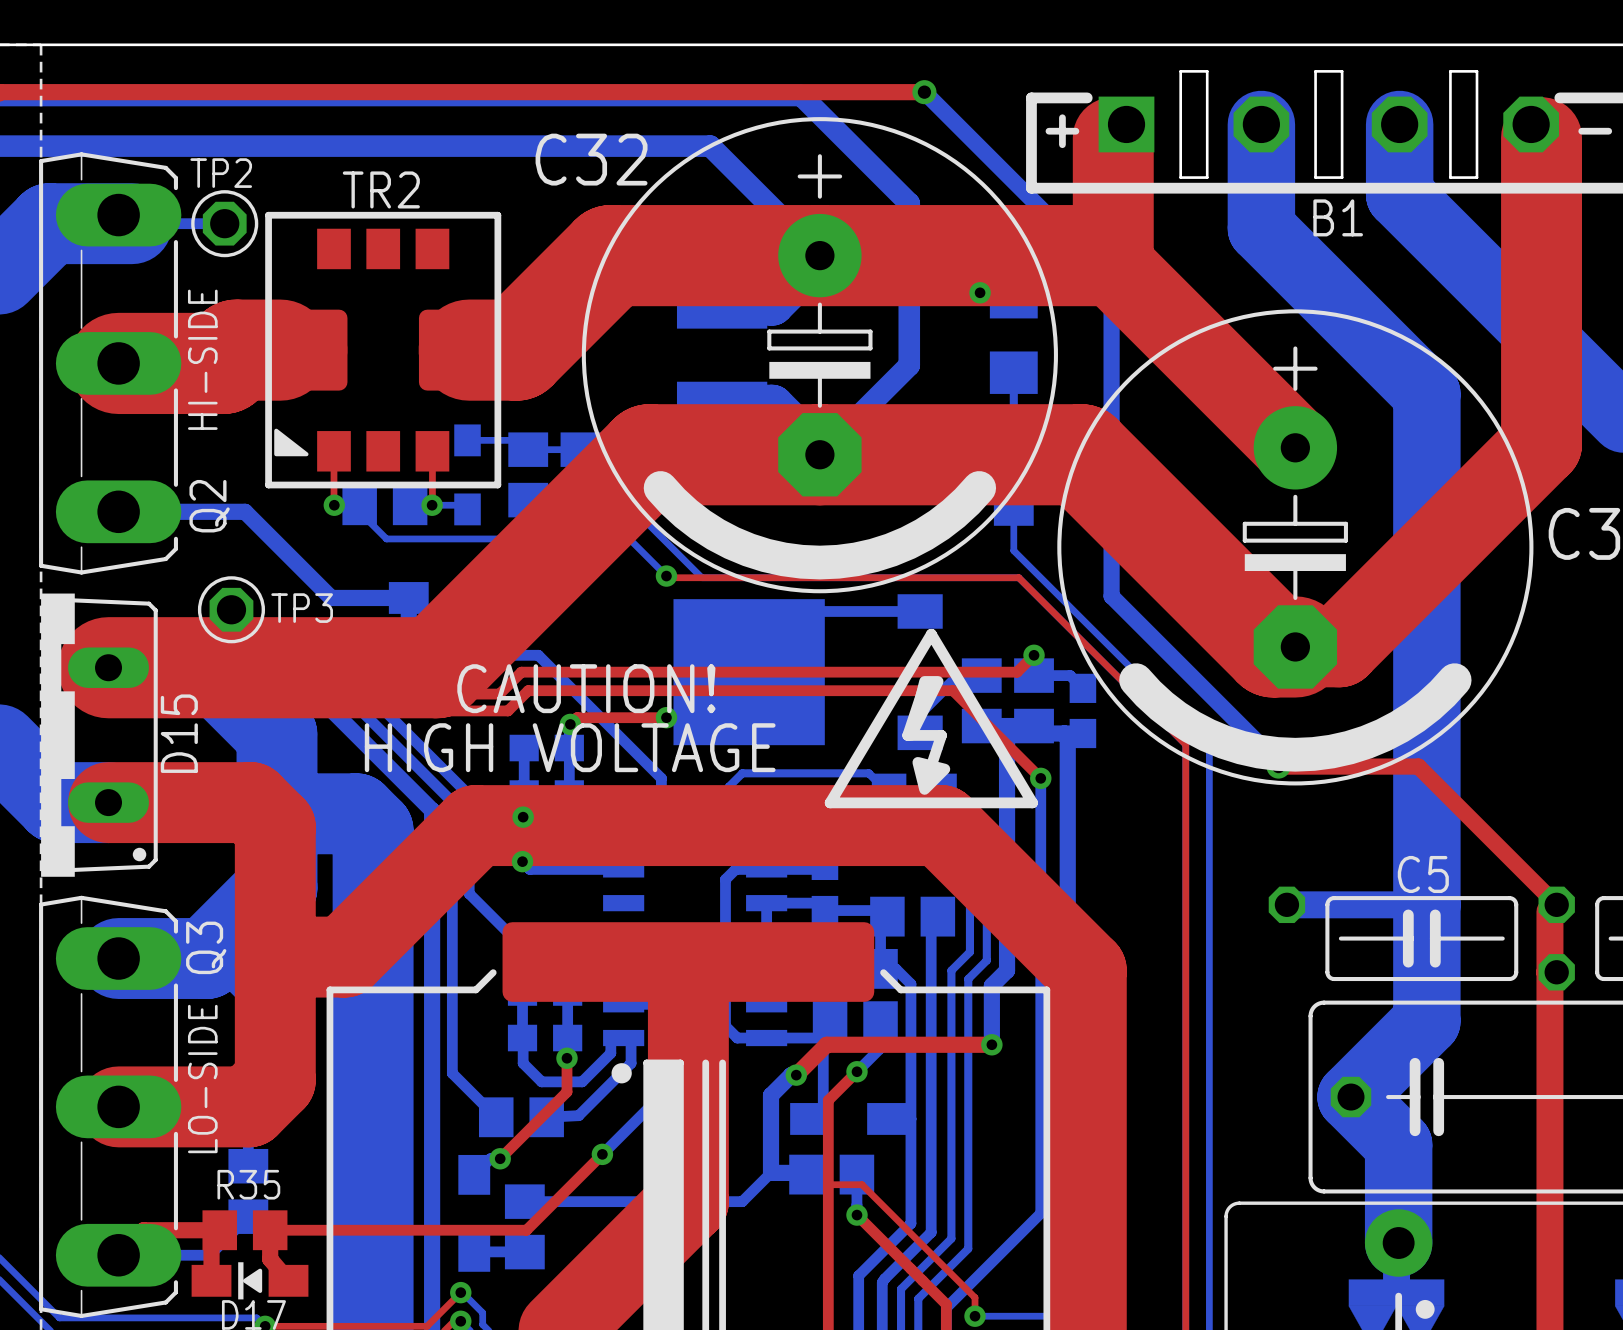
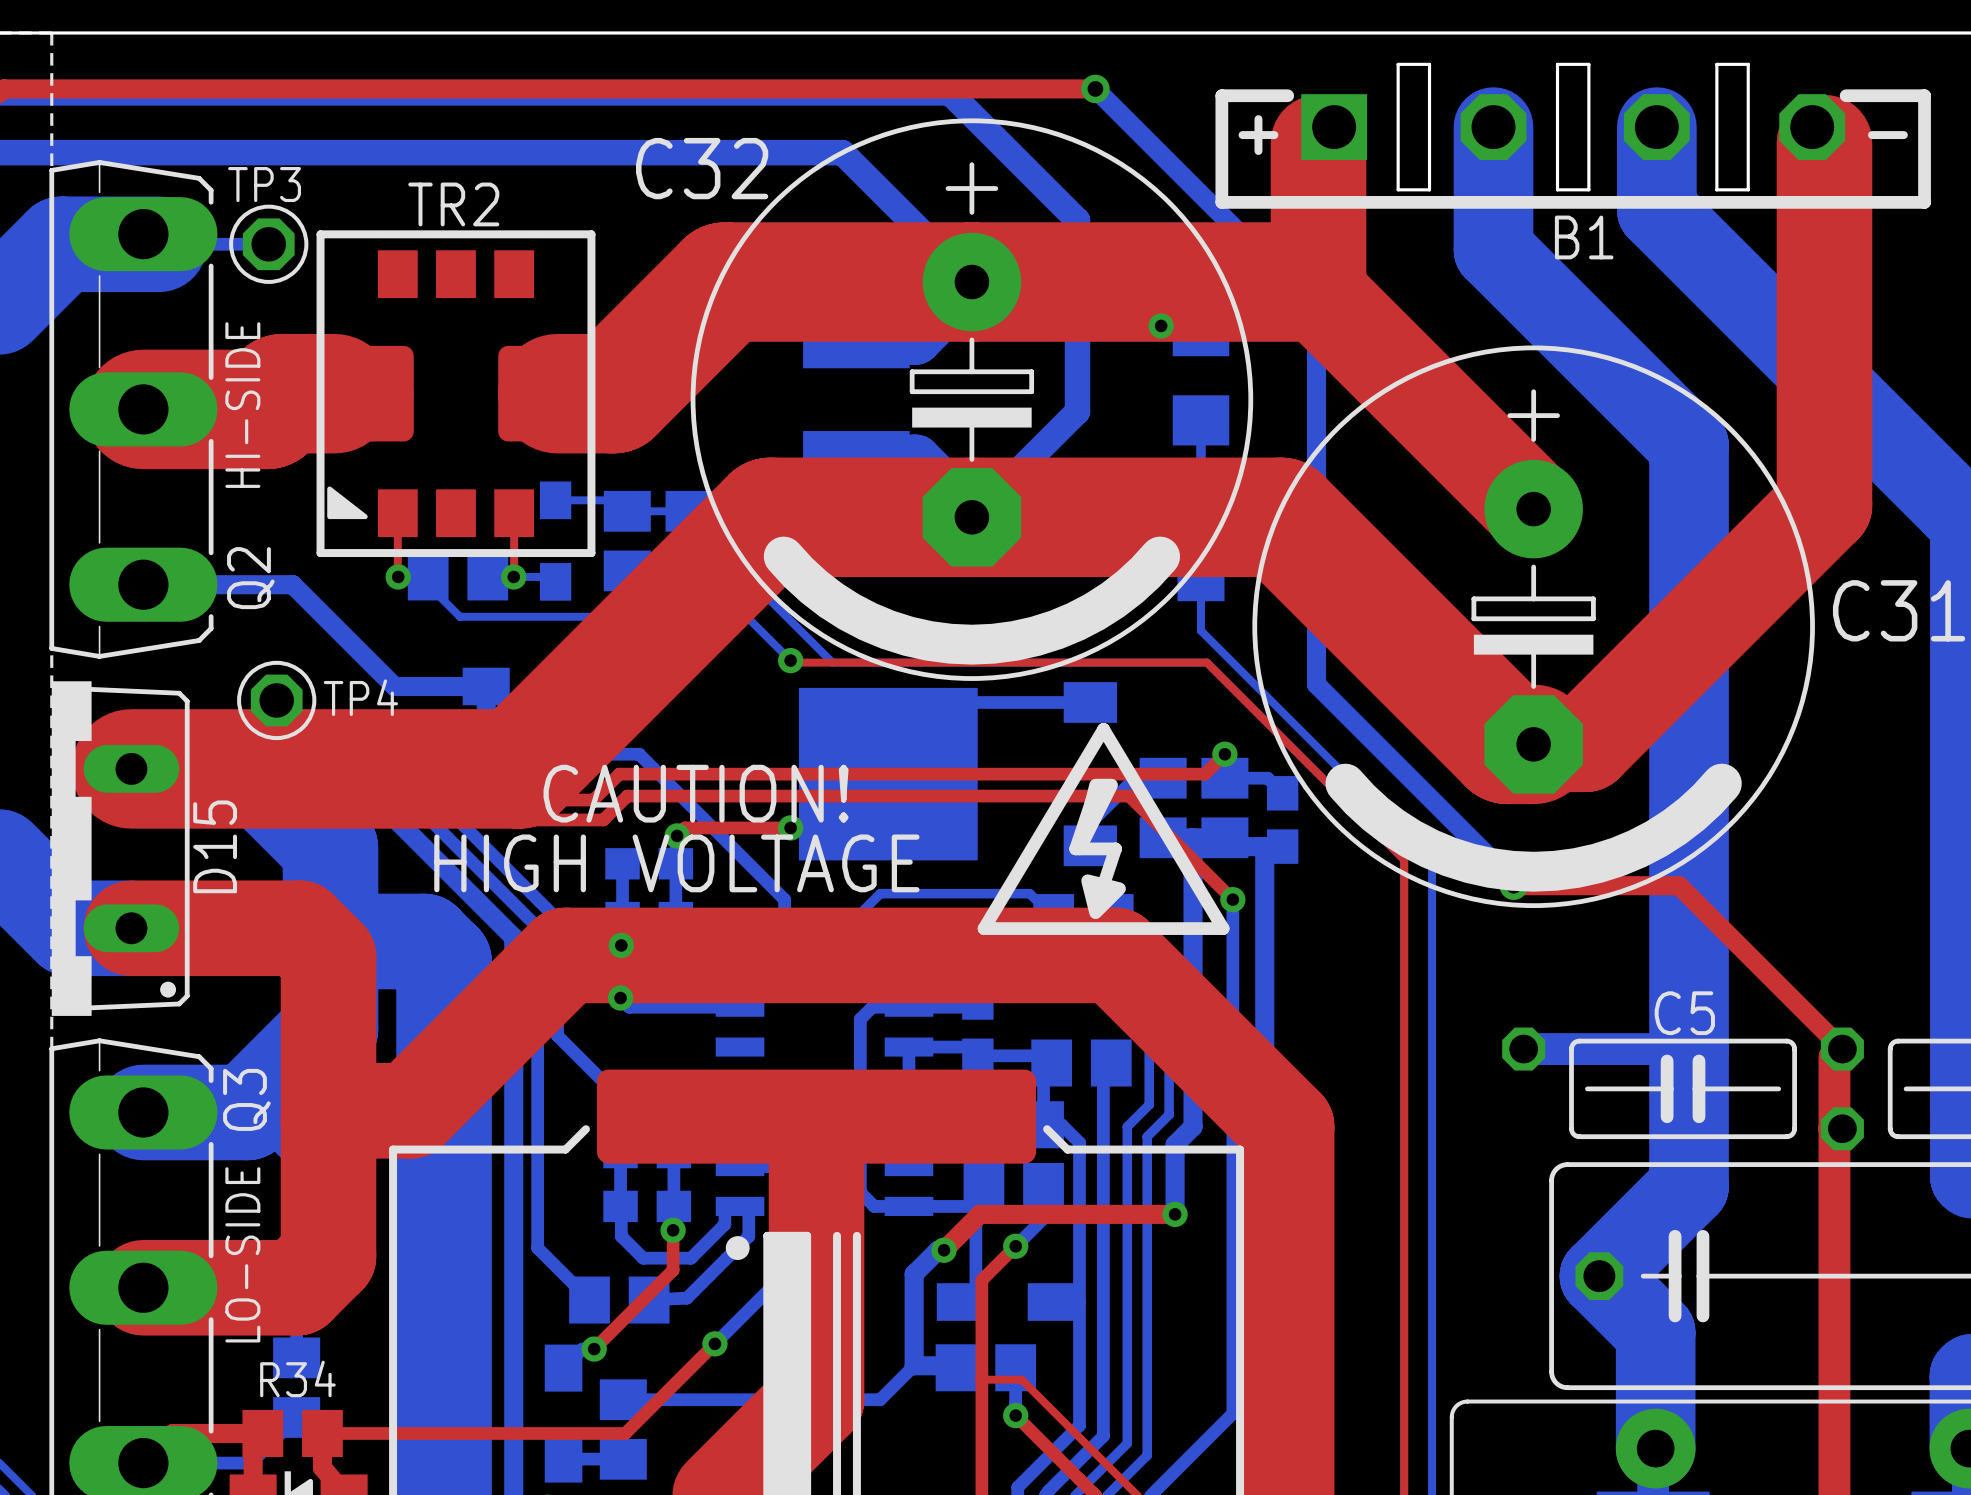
TP2 name: TP2 (221, 173) -> TP3 (264, 184)
TP3 name: TP3 (302, 608) -> TP4 (360, 697)
R35 name: R35 (248, 1184) -> R34 (297, 1378)

